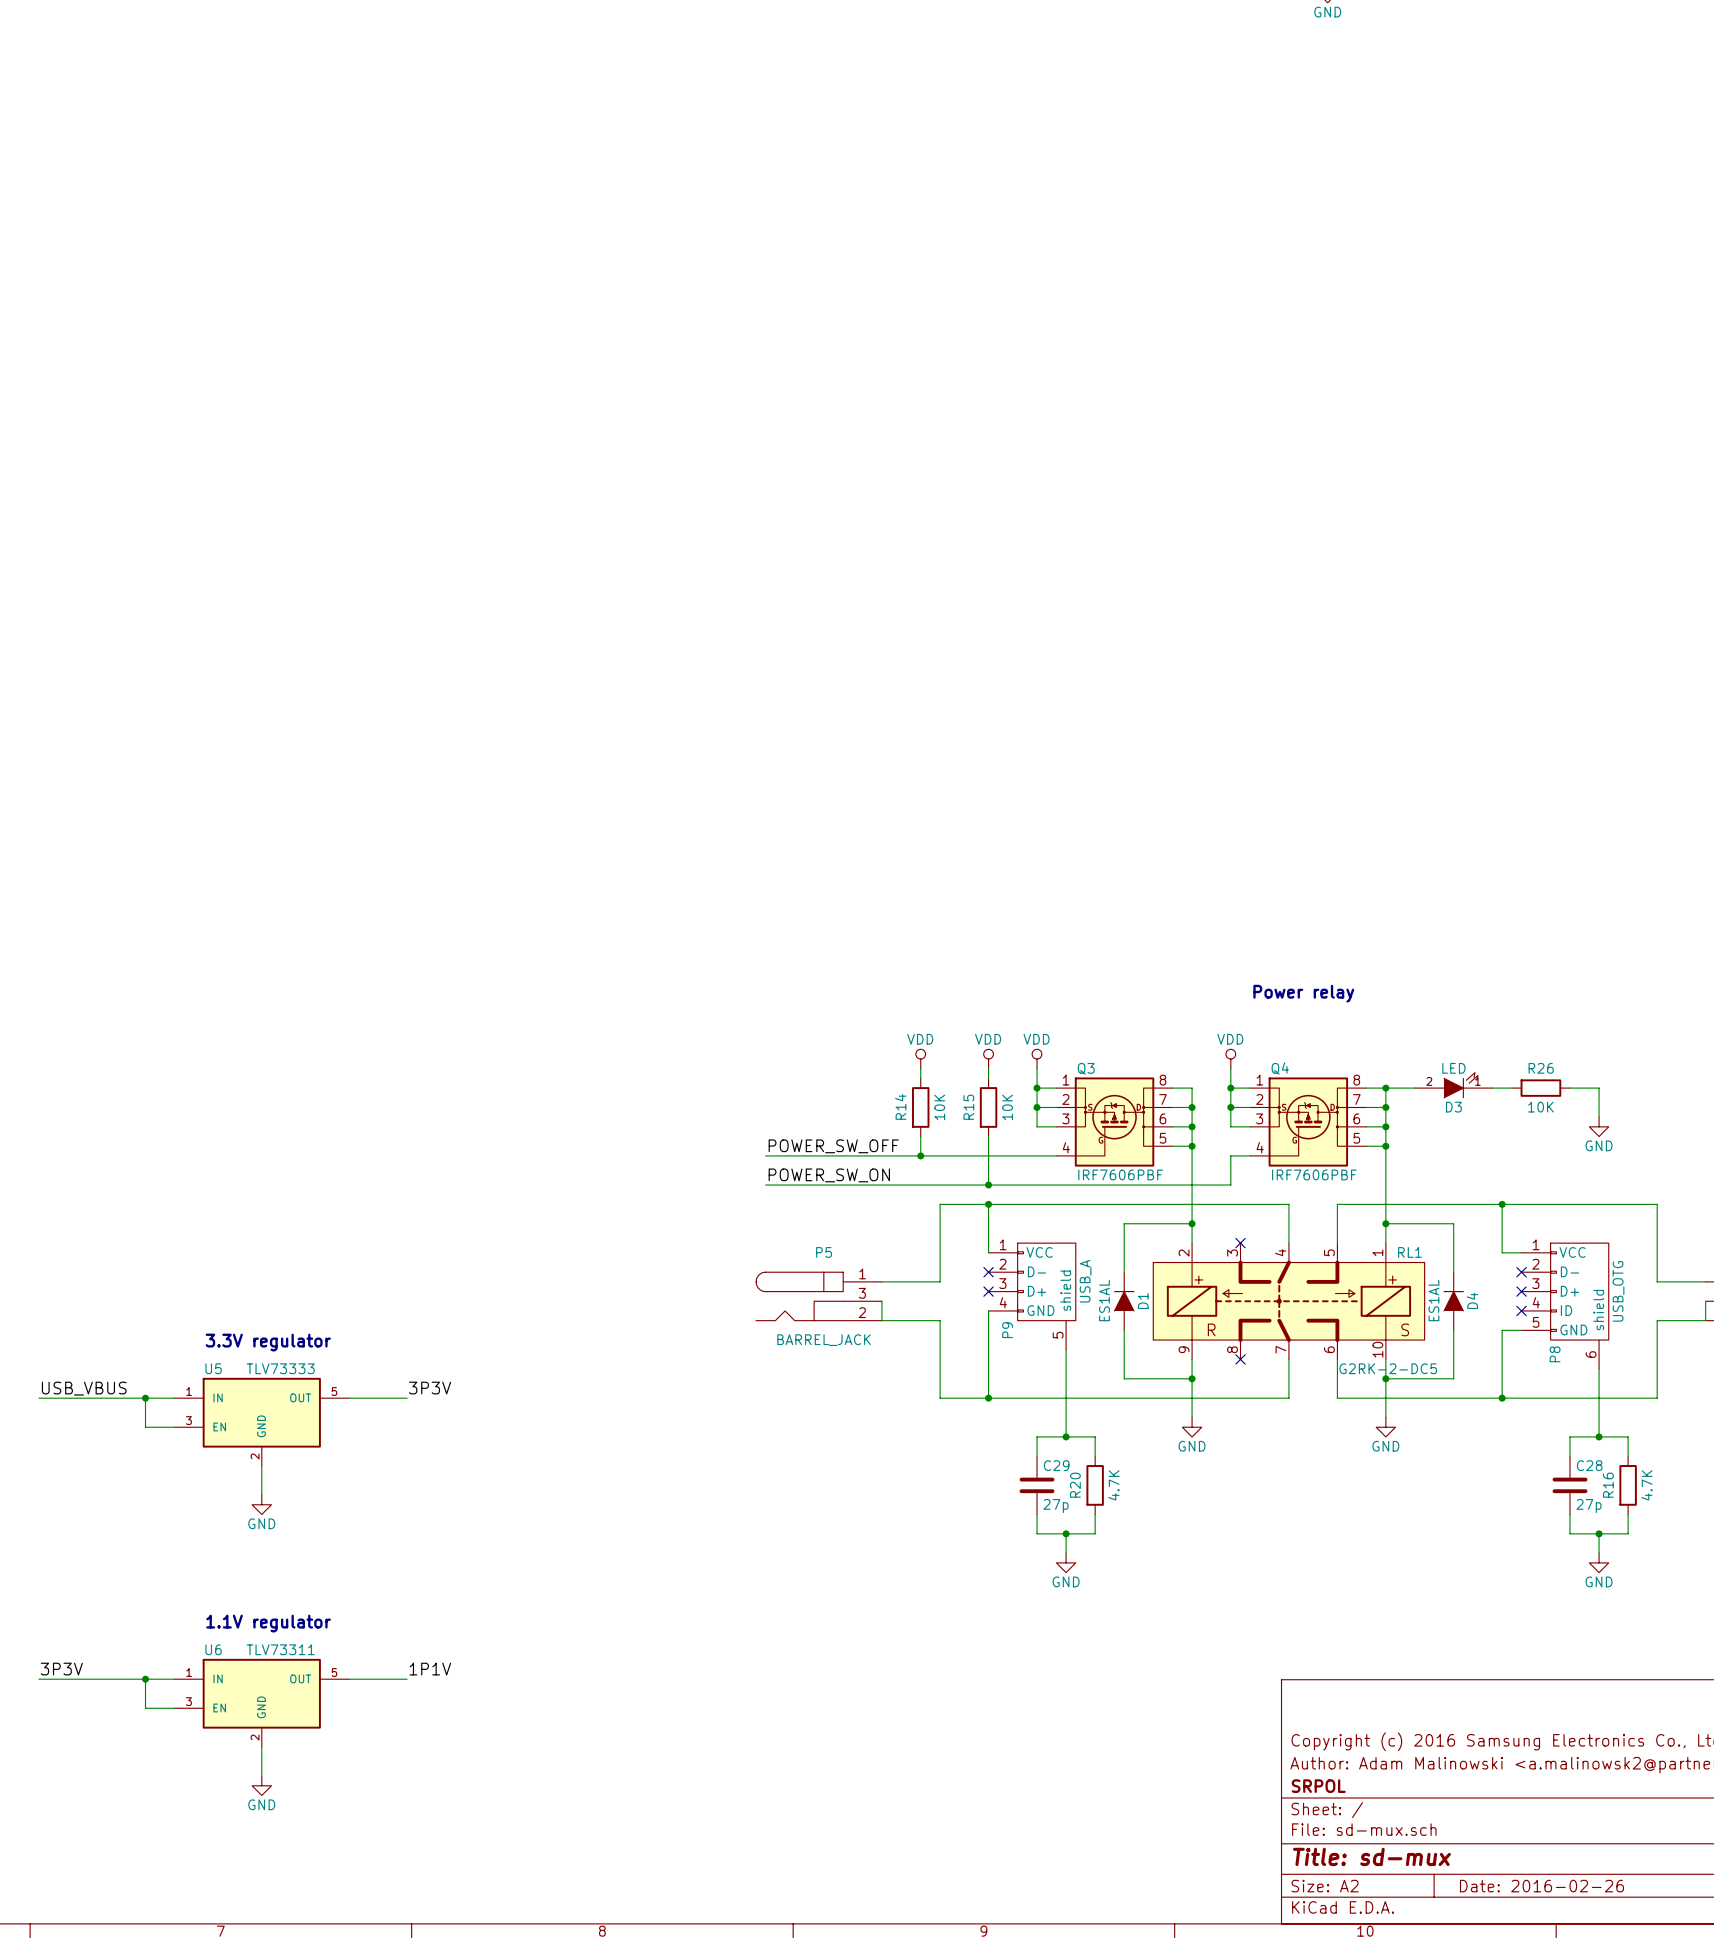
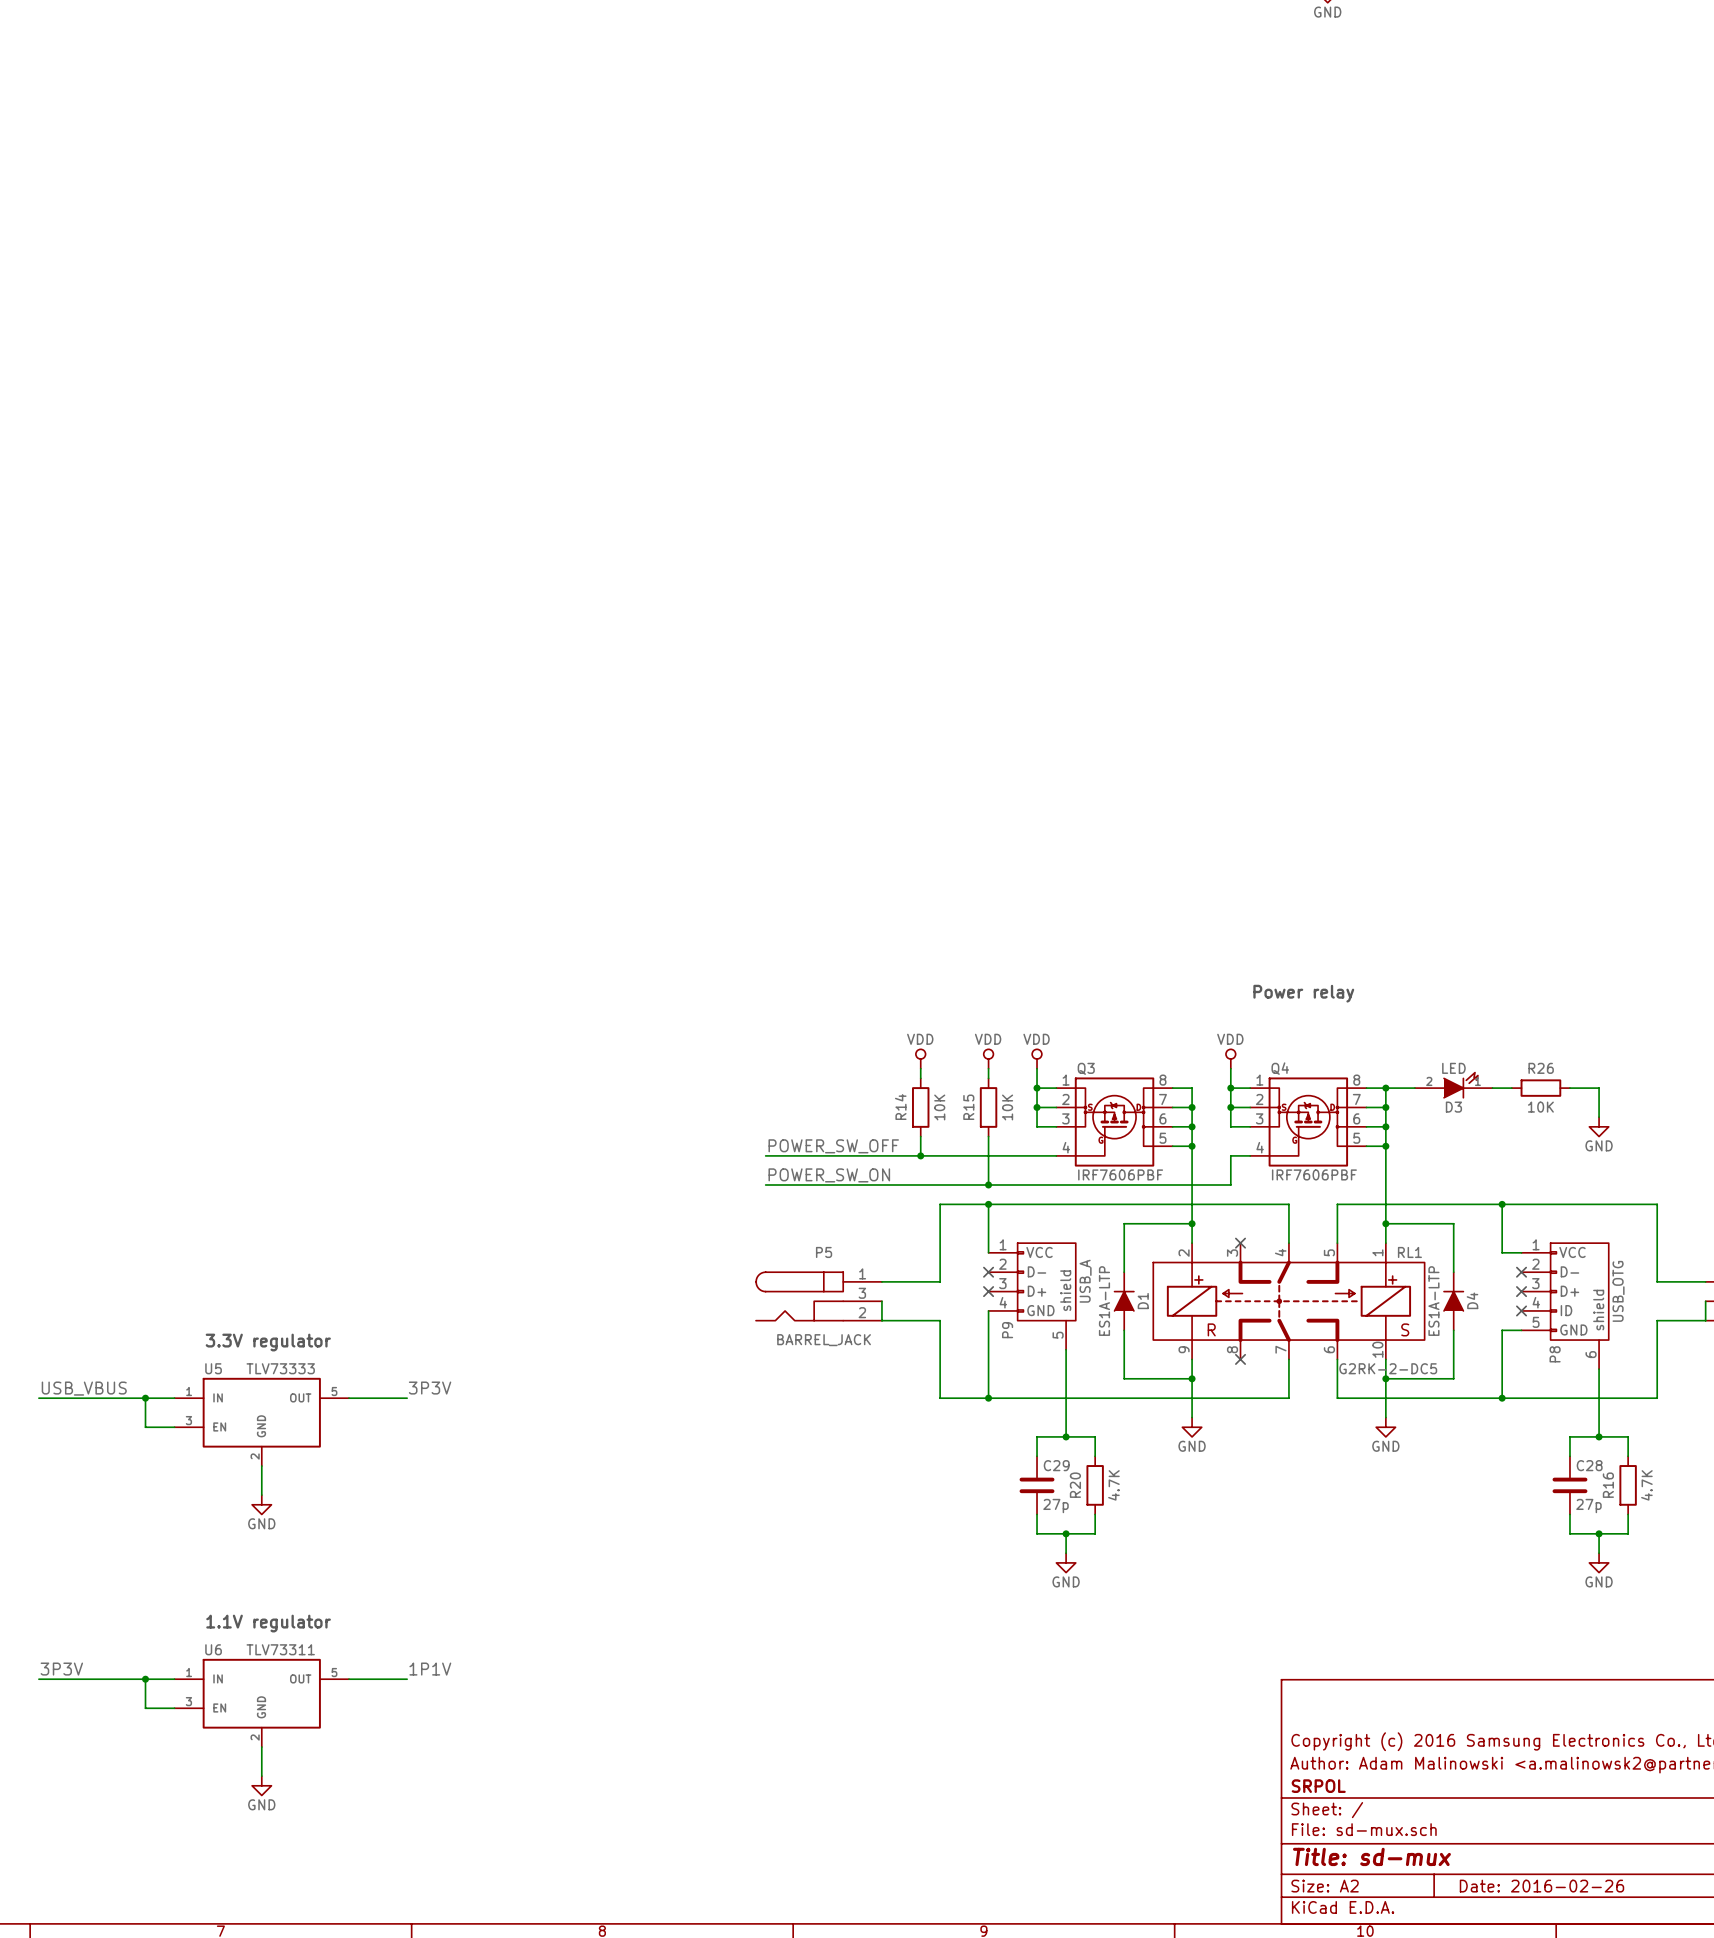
D1 value: ES1AL (1104, 1300) -> ES1A-LTP (1104, 1301)
D4 value: ES1AL (1433, 1300) -> ES1A-LTP (1433, 1301)

